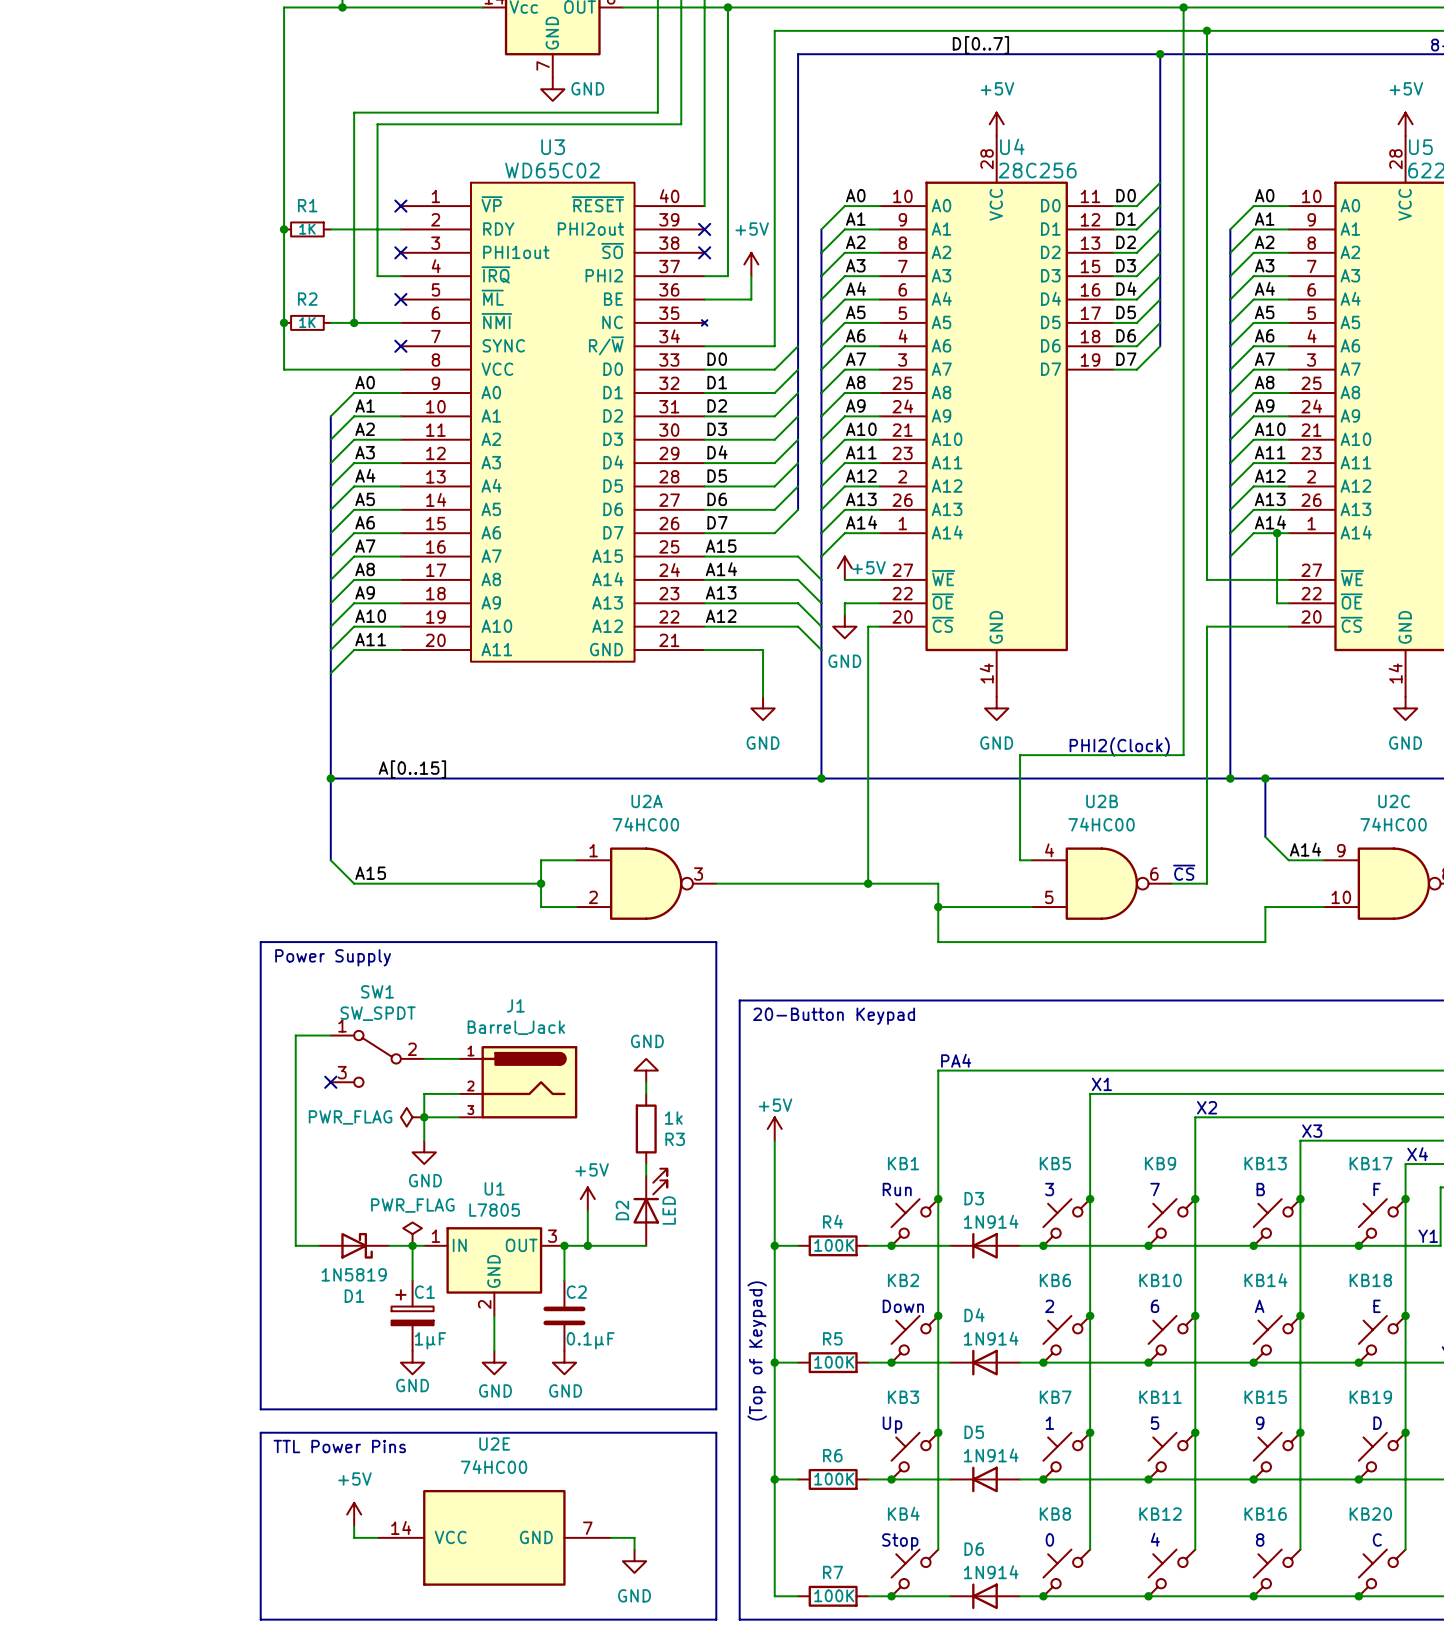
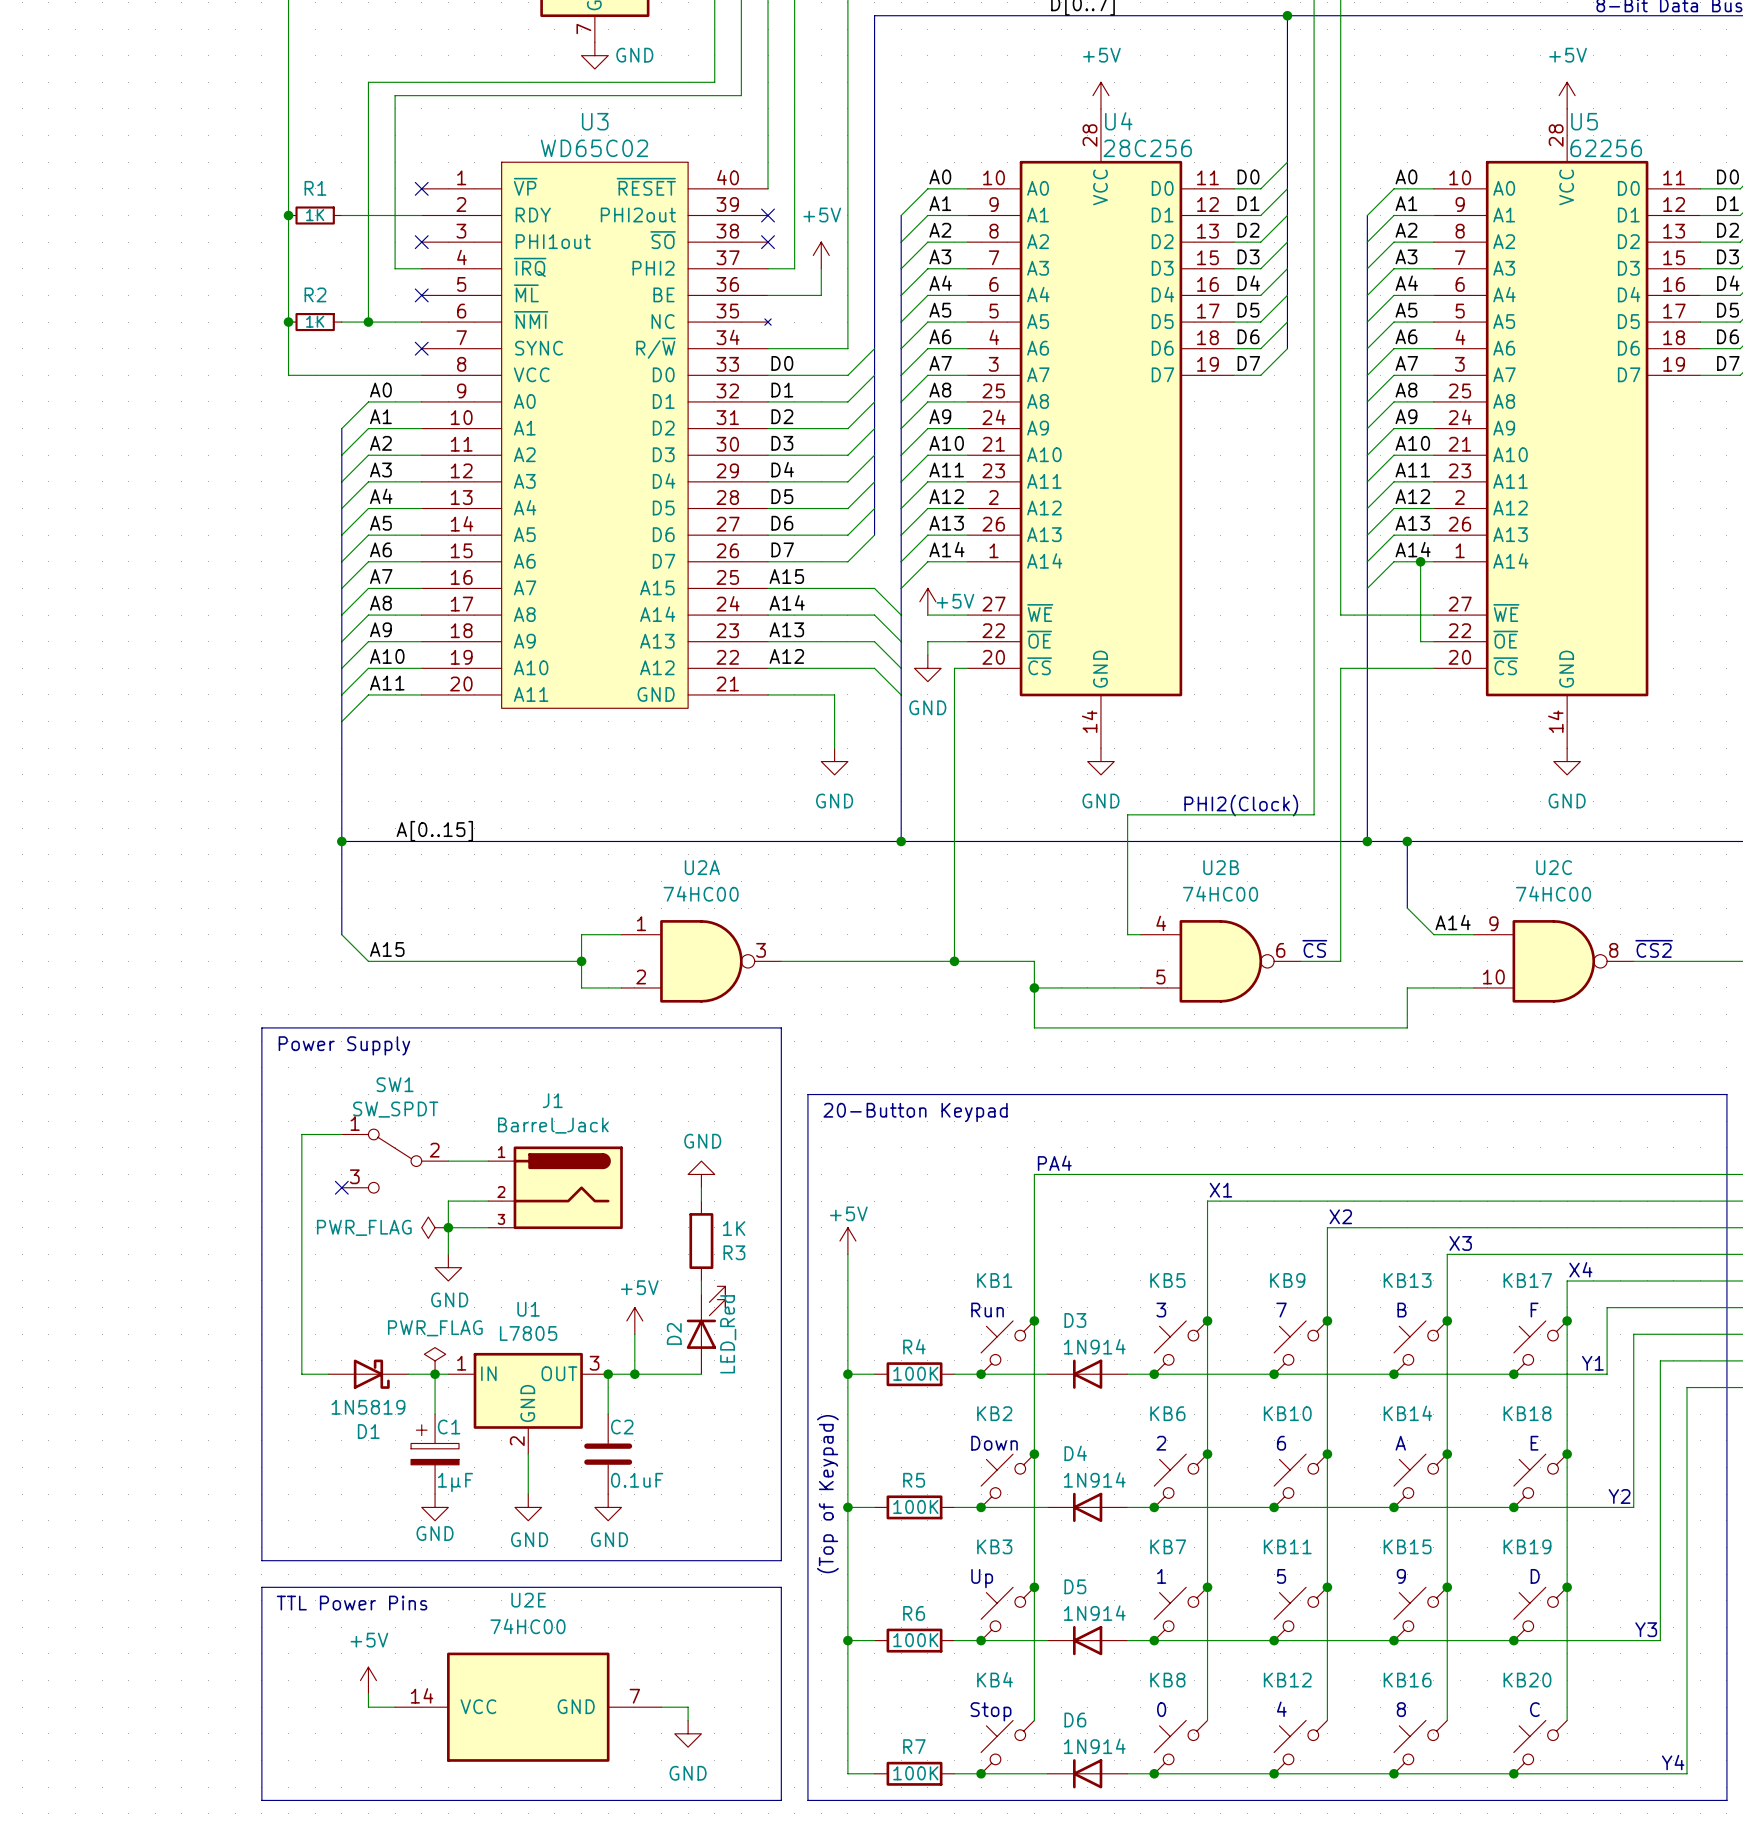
R3 value: 1k (673, 1118) -> 1K (734, 1228)
D2 value: LED (669, 1210) -> LED_Red (728, 1334)
C2 value: 0.1µF (590, 1340) -> 0.1uF (637, 1480)

